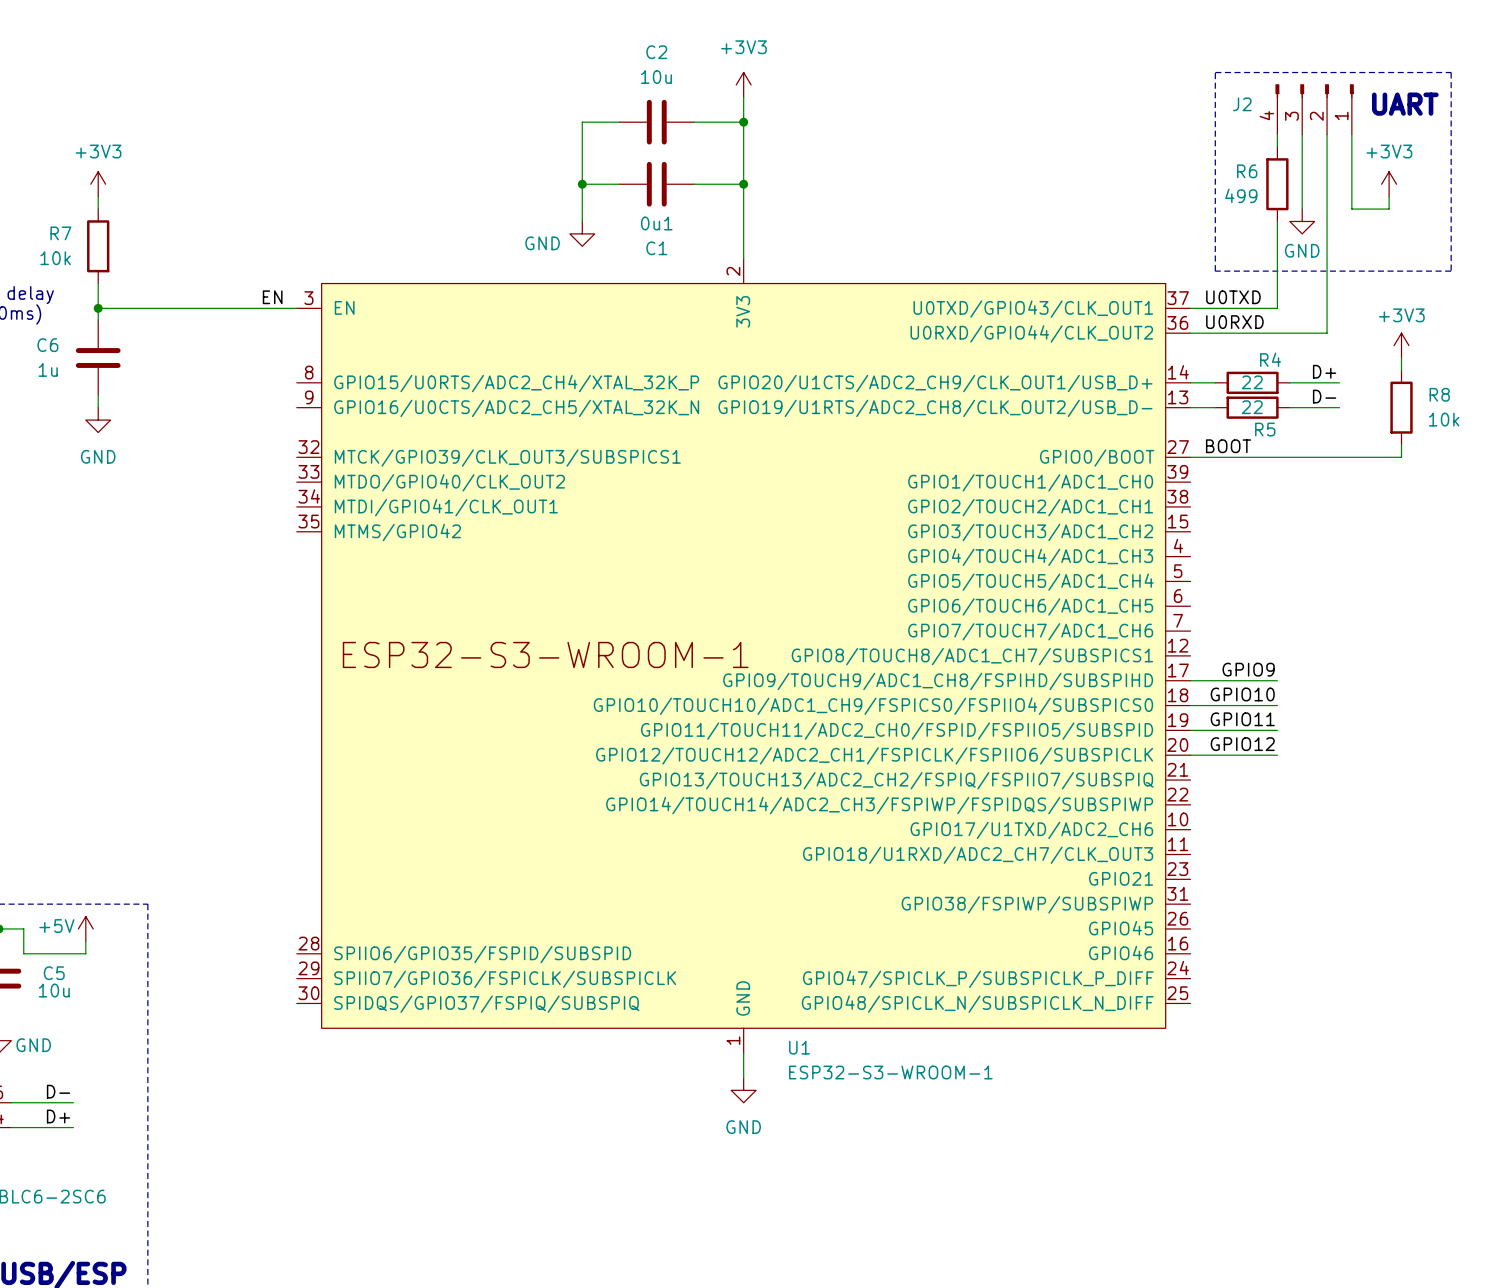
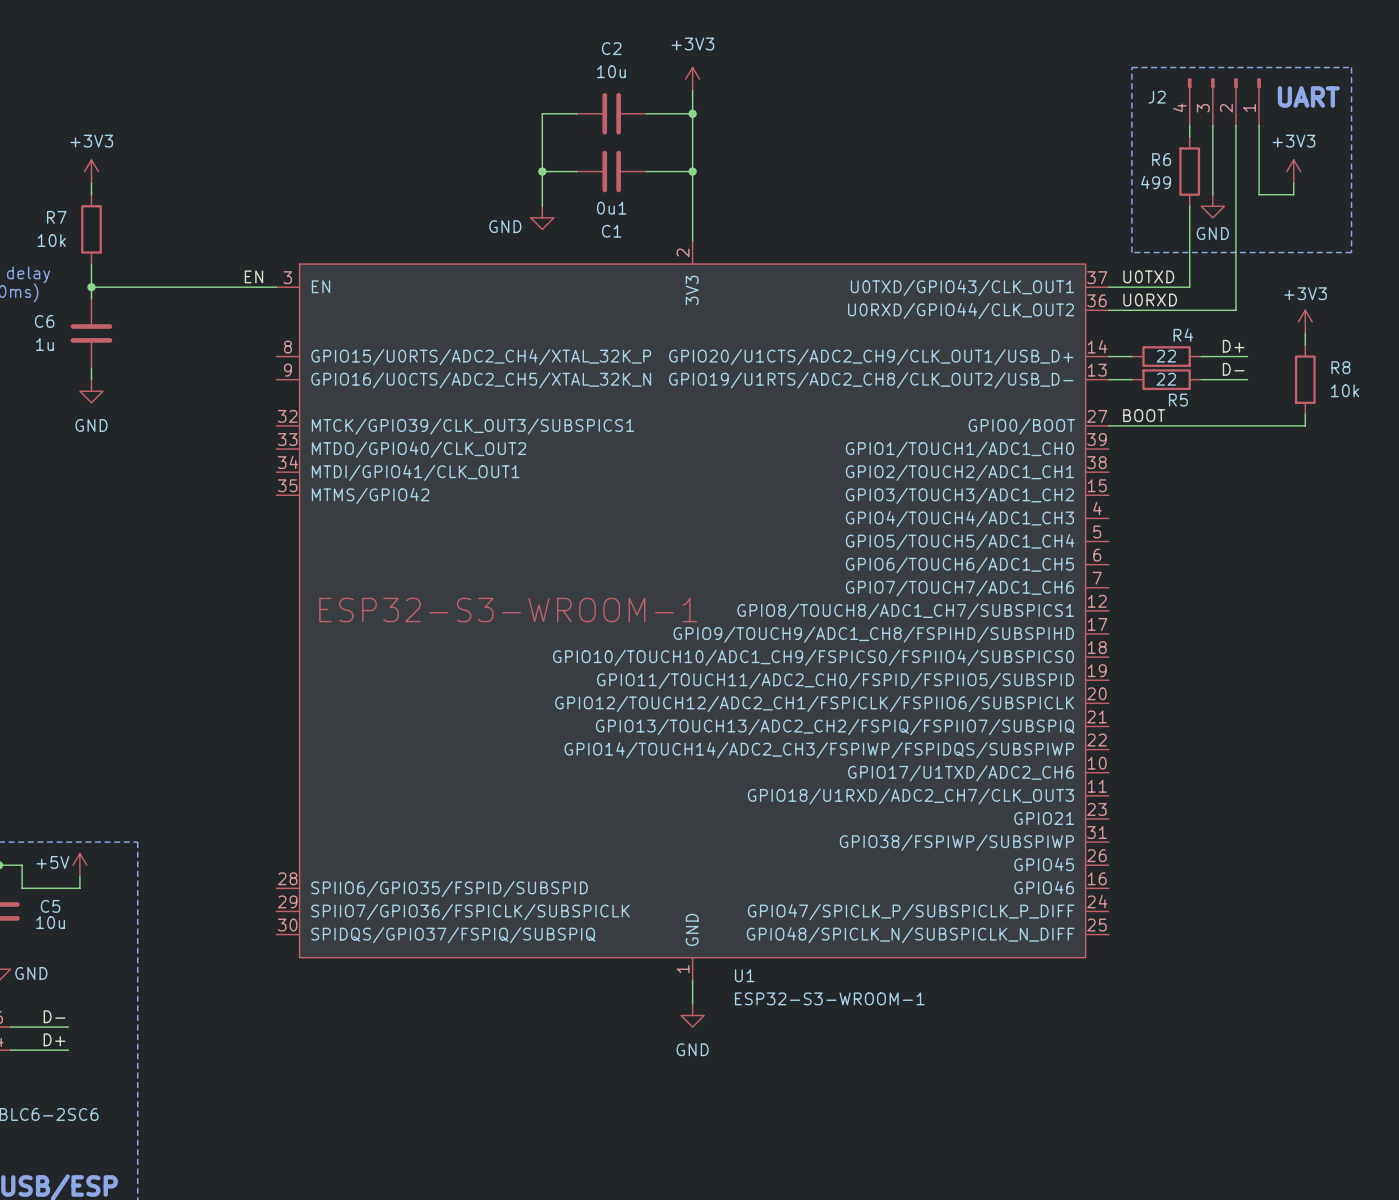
label: GPIO9 (1248, 669) -> none
wire: (1190, 680) (1277, 680) -> none
label: GPIO10 (1242, 694) -> none
wire: (1190, 705) (1277, 705) -> none
label: GPIO11 (1242, 719) -> none
wire: (1190, 730) (1277, 730) -> none
label: GPIO12 (1242, 744) -> none
wire: (1190, 755) (1277, 755) -> none

